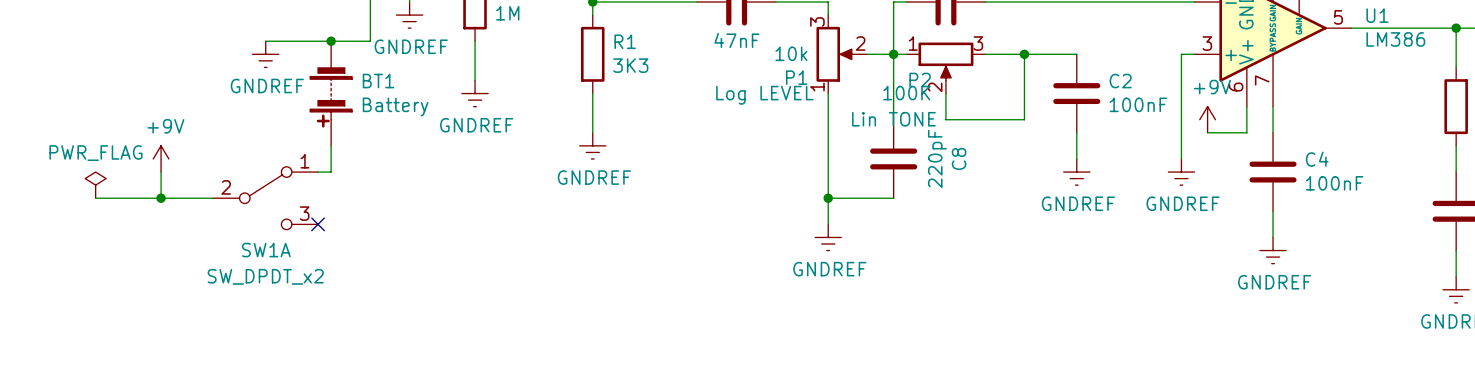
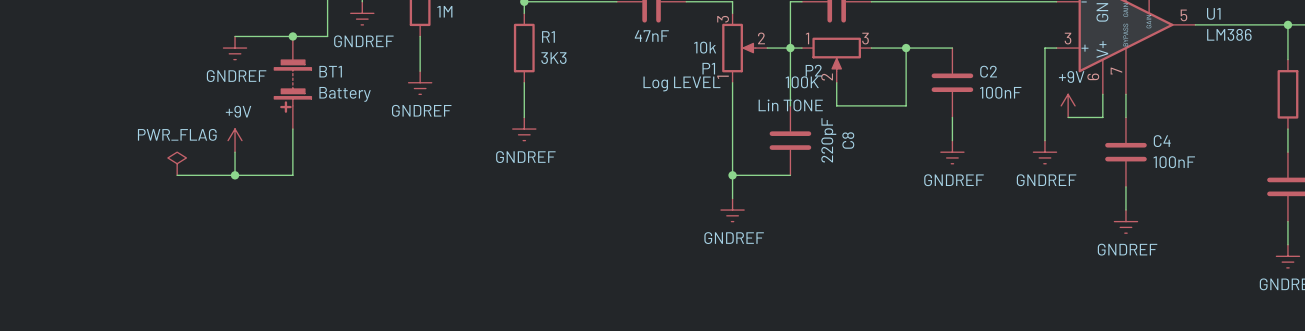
power symbol position: +9V (161, 158) -> +9V (235, 140)
wire: (161, 172) (161, 198) -> (235, 152) (235, 175)
wire: (318, 172) (331, 172) -> (188, 175) (292, 175) (292, 152)
power symbol position: PWR_FLAG (95, 185) -> PWR_FLAG (177, 163)
wire: (95, 198) (200, 198) -> none
junction: (161, 198) -> none
SW1A: SW_DPDT_x2 (265, 198) -> none
junction: none -> (235, 175)
no-connect mark: (318, 224) -> none

